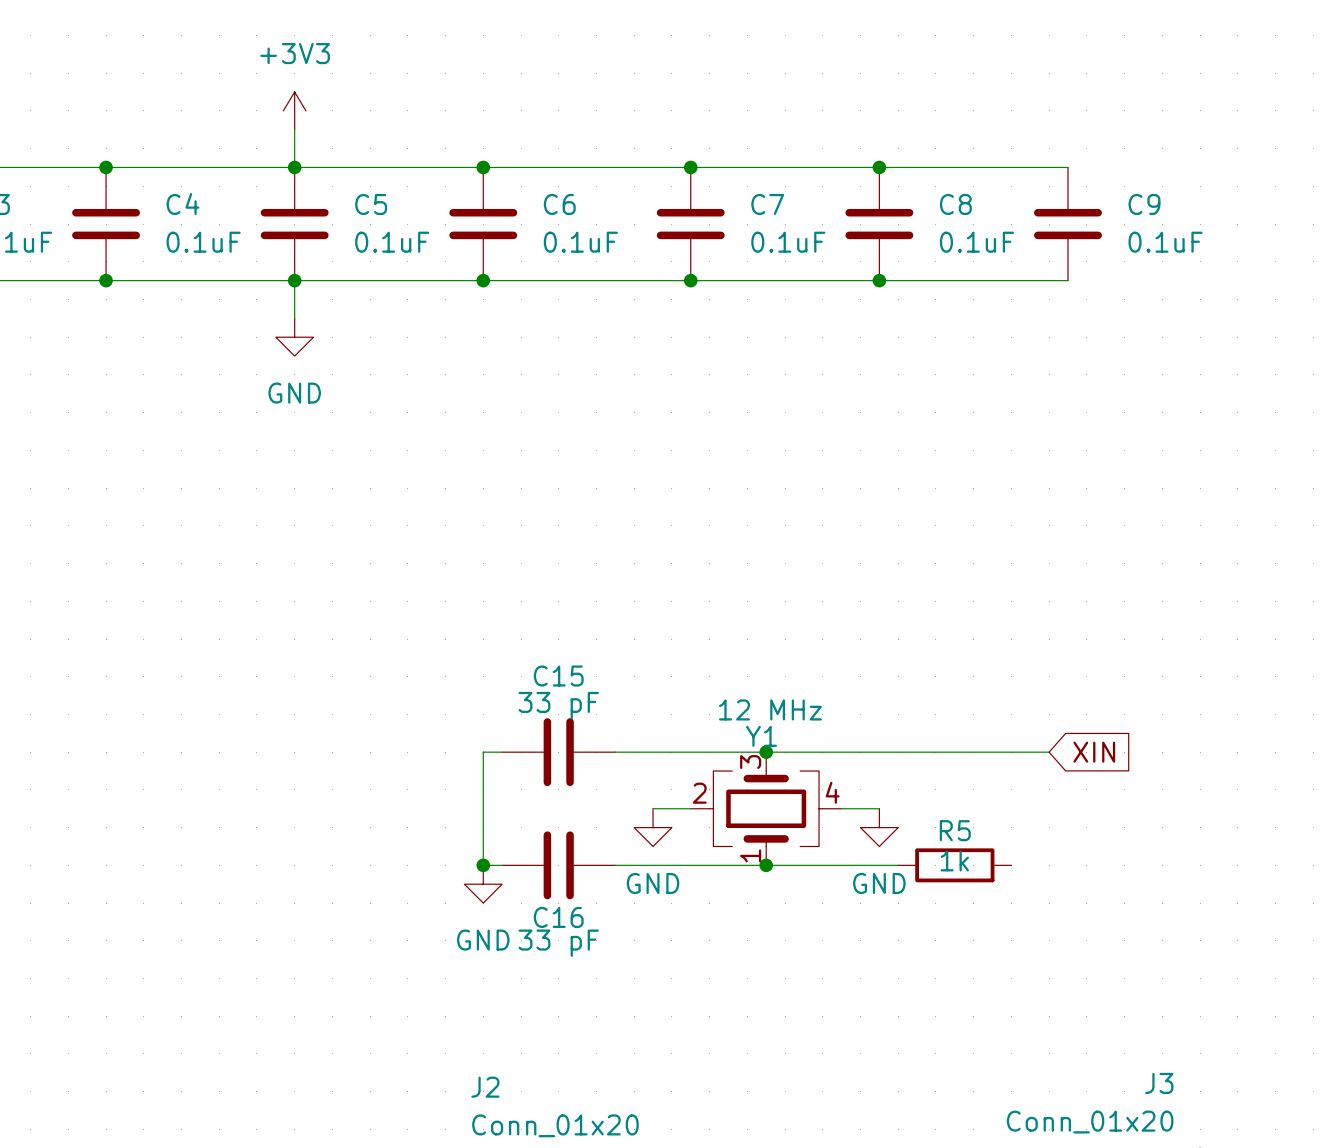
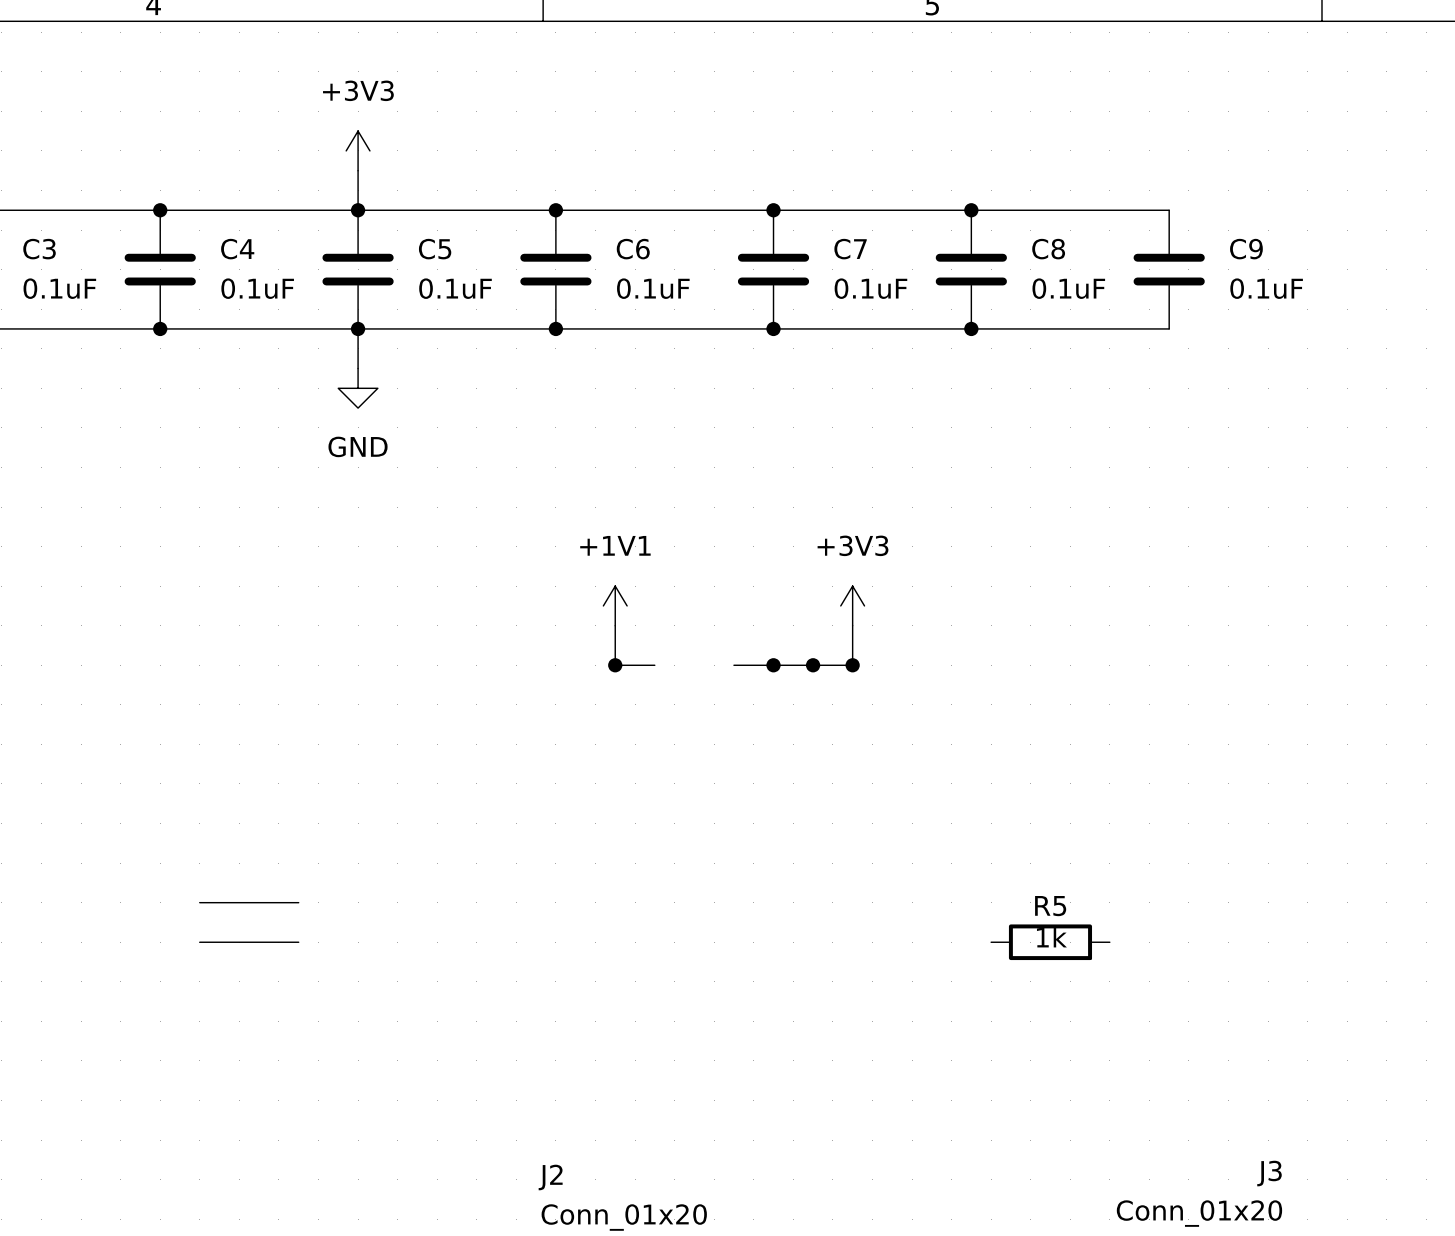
power symbol: none -> +1V1 (615, 605)
power symbol: none -> +3V3 (852, 605)
wire: none -> (615, 625) (615, 665) (654, 665)
wire: none -> (852, 625) (852, 665) (733, 665)
junction: none -> (615, 665)
junction: none -> (773, 665)
junction: none -> (813, 665)
junction: none -> (852, 665)
wire: (502, 752) (483, 752) (483, 865) (502, 865) -> none
C15: 33 pF (558, 752) -> none
wire: (615, 752) (1049, 752) -> none
junction: (766, 752) -> none
global label: XIN (1094, 752) -> none
wire: (653, 808) (690, 808) -> none
Y1: 12 MHz (766, 808) -> none
wire: (841, 808) (879, 808) -> none
wire: none -> (199, 902) (298, 902)
power symbol: GND (653, 827) -> none
power symbol: GND (879, 827) -> none
wire: none -> (199, 942) (298, 942)
junction: (483, 865) -> none
C16: 33 pF (558, 865) -> none
wire: (615, 865) (898, 865) -> none
junction: (766, 865) -> none
power symbol: GND (483, 884) -> none

